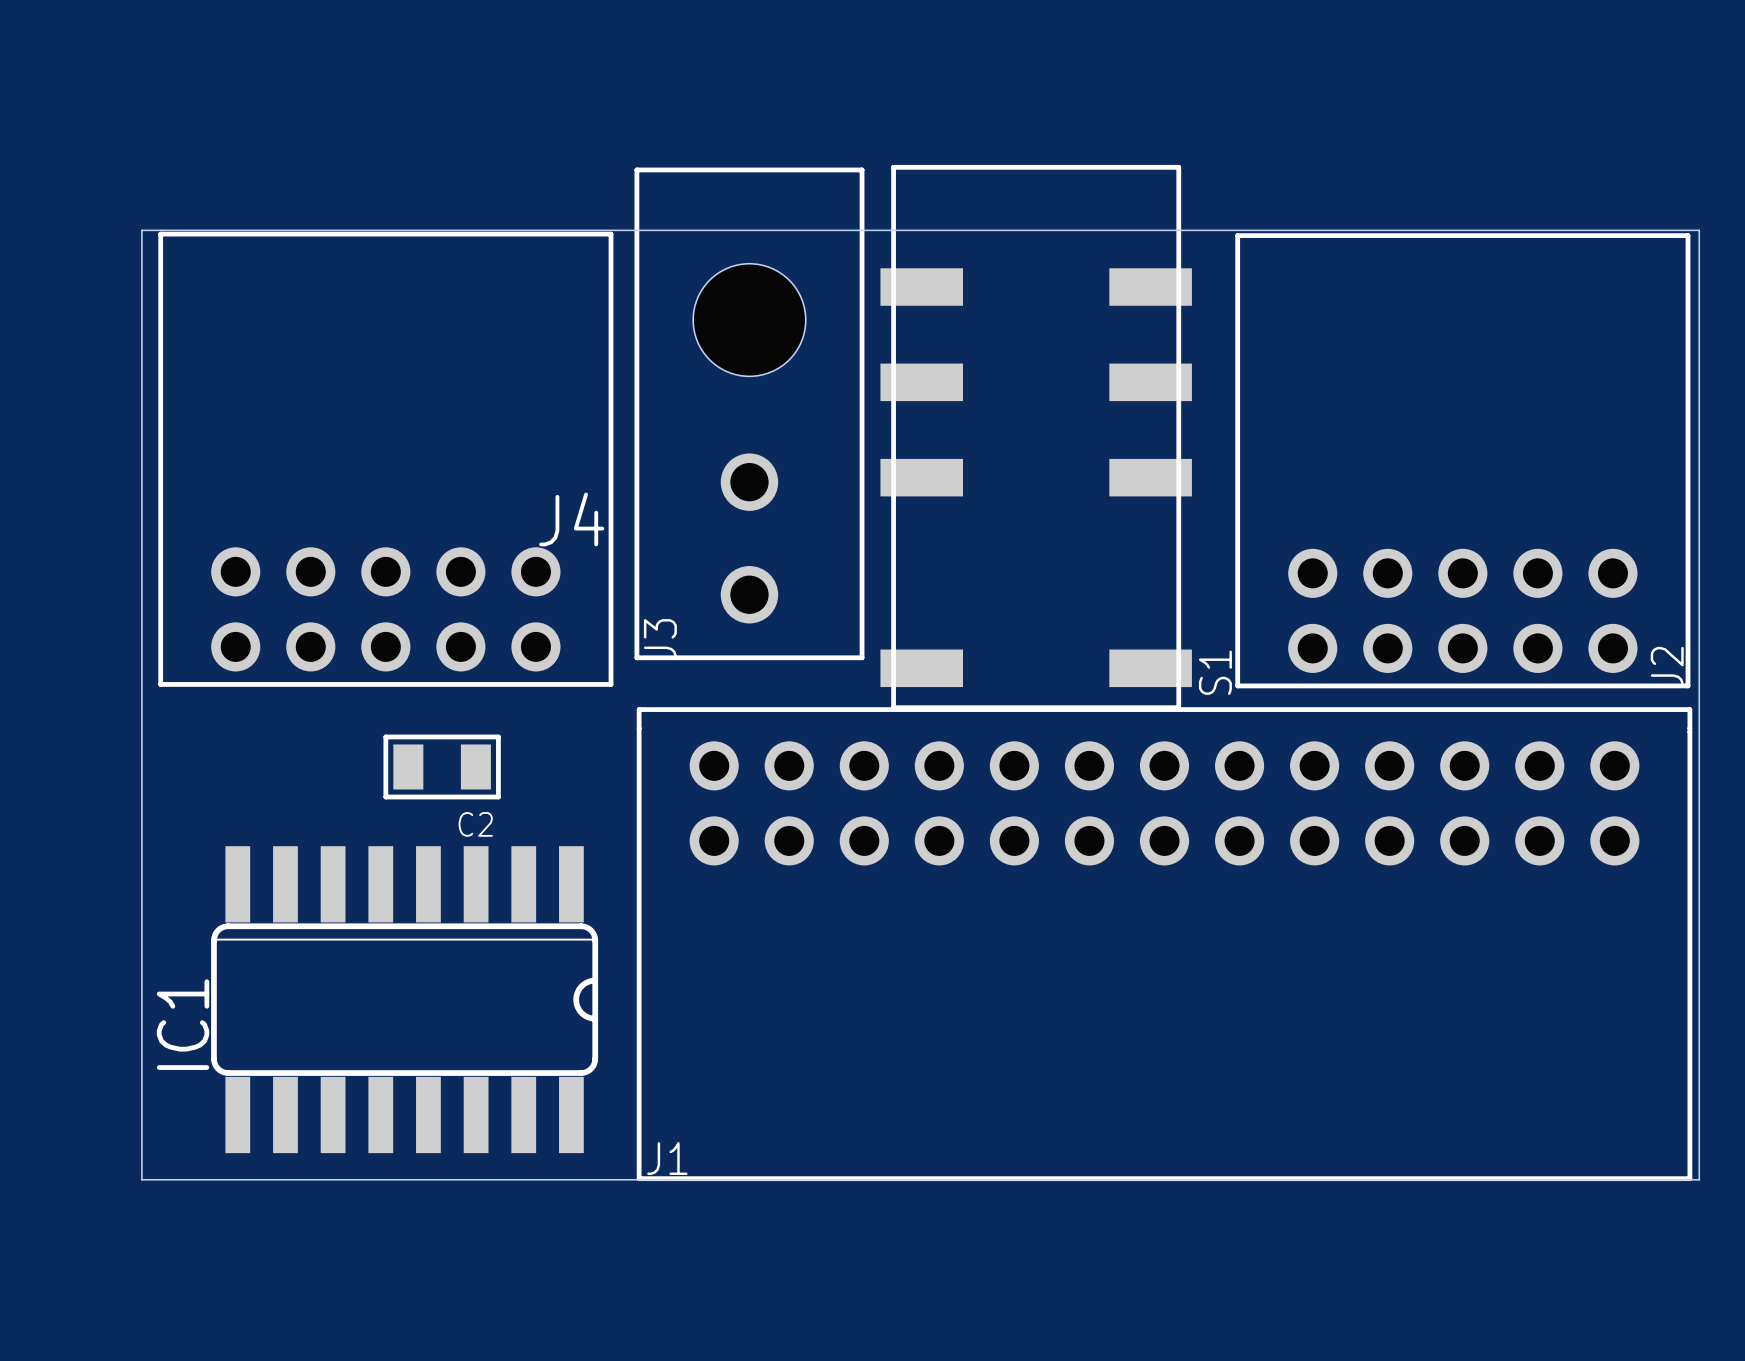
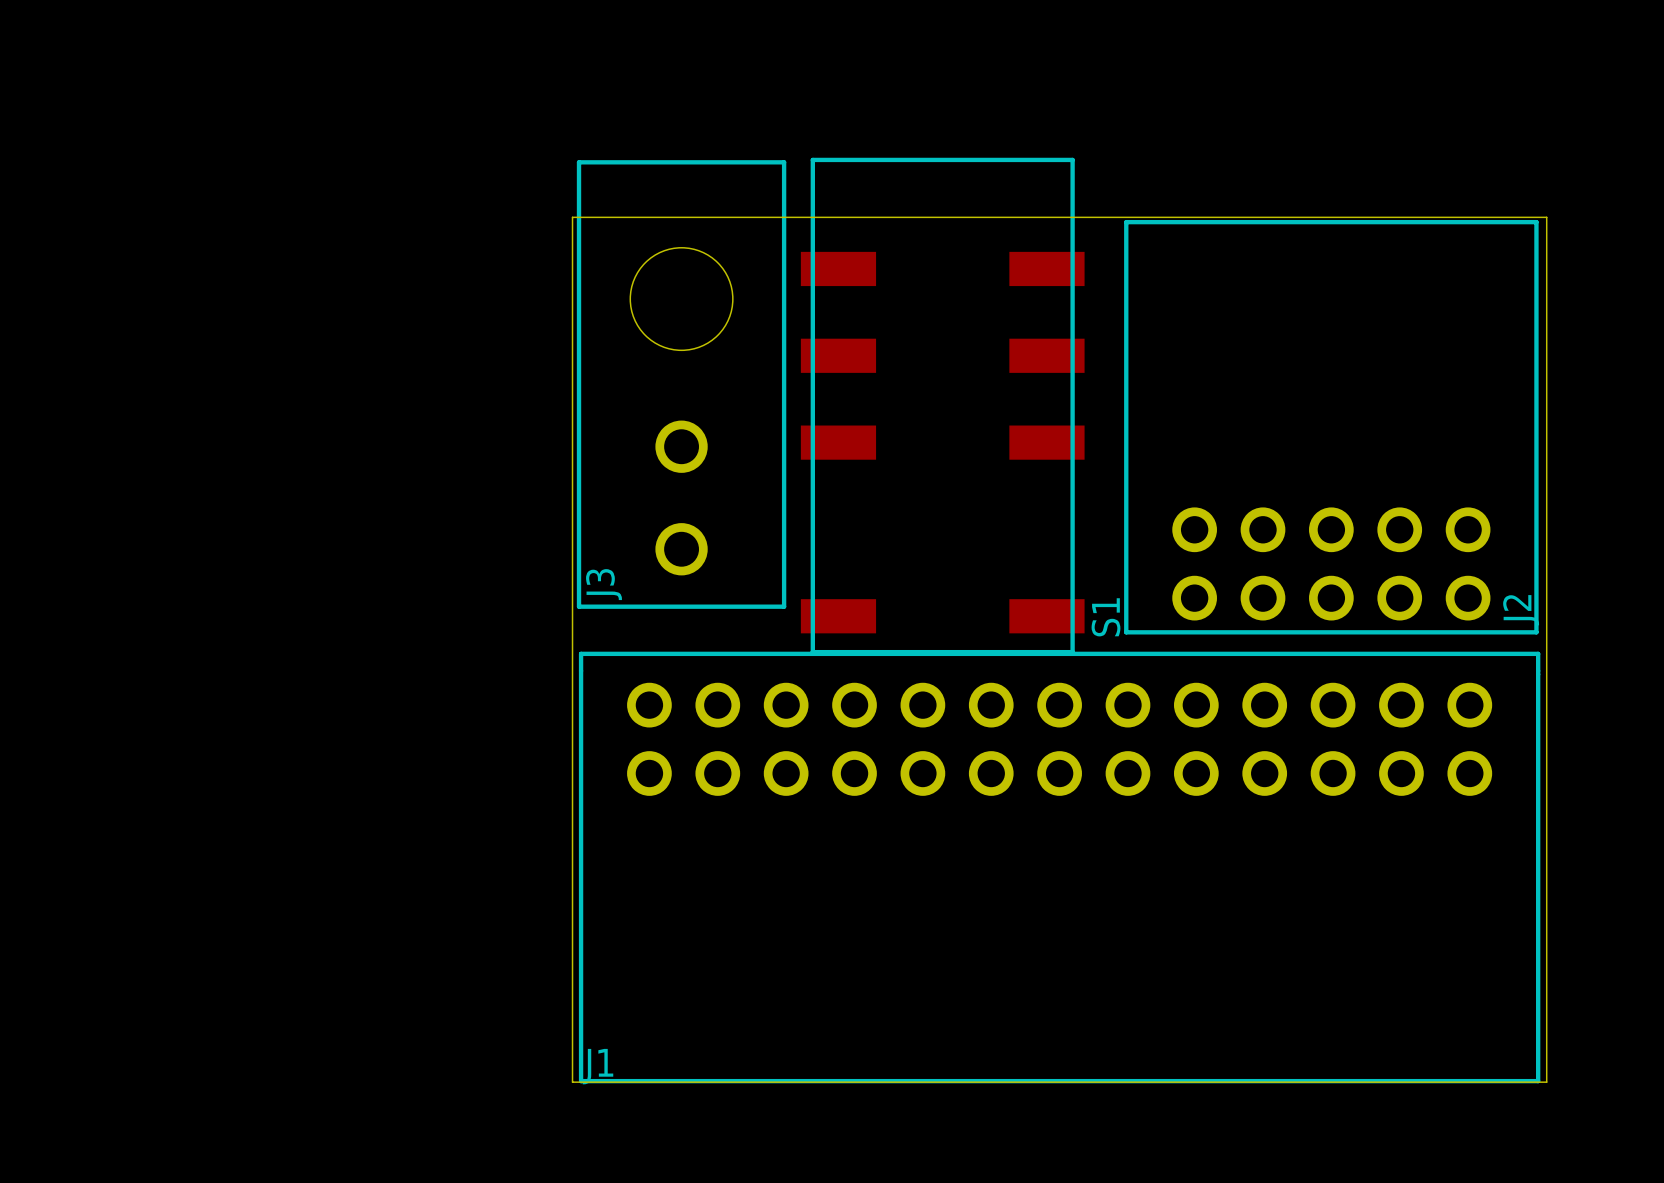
board edge: (629, 230) (141, 230) (141, 1179) (629, 1179) -> (572, 217) (572, 1082)
J4: (385, 459) -> none
C2: (442, 766) -> none
IC1: (404, 999) -> none

